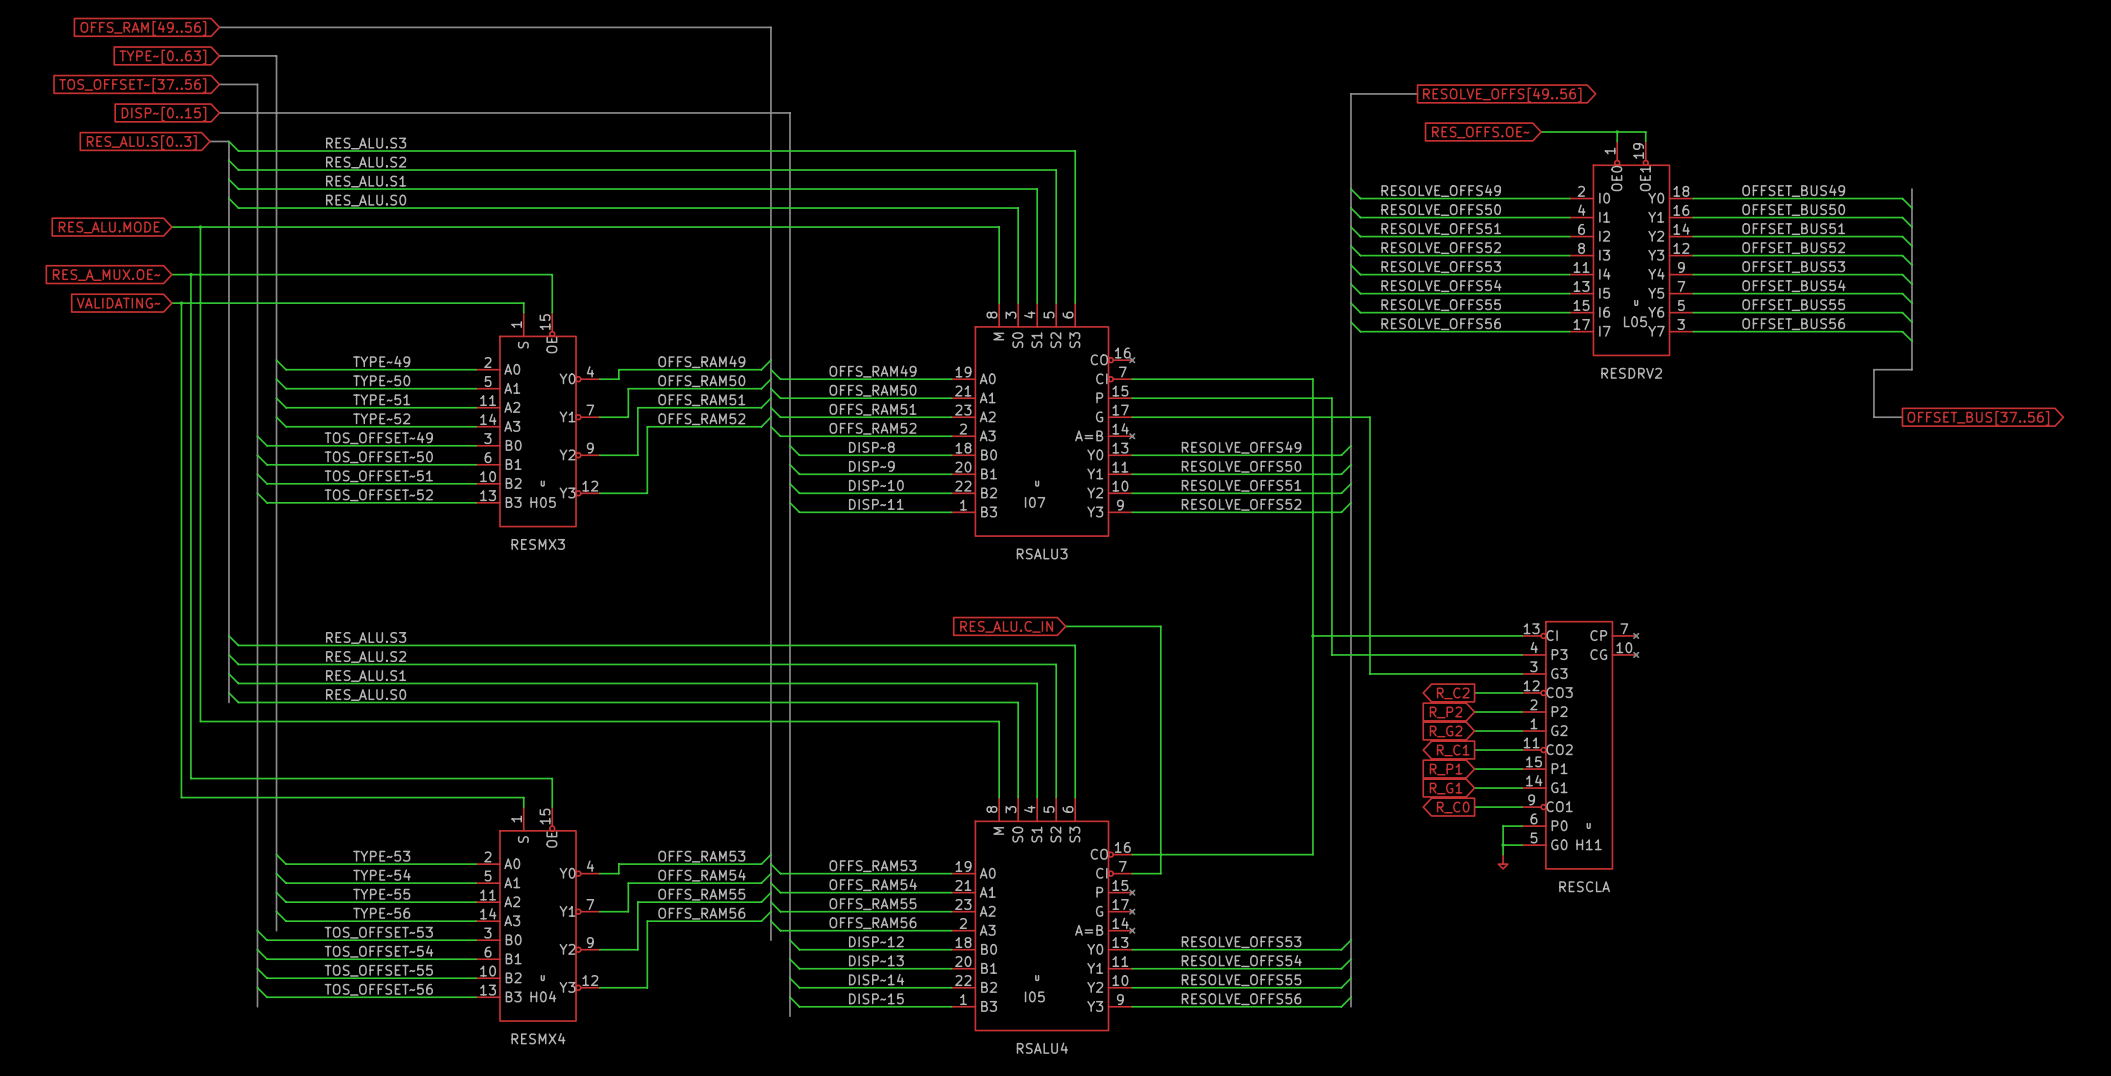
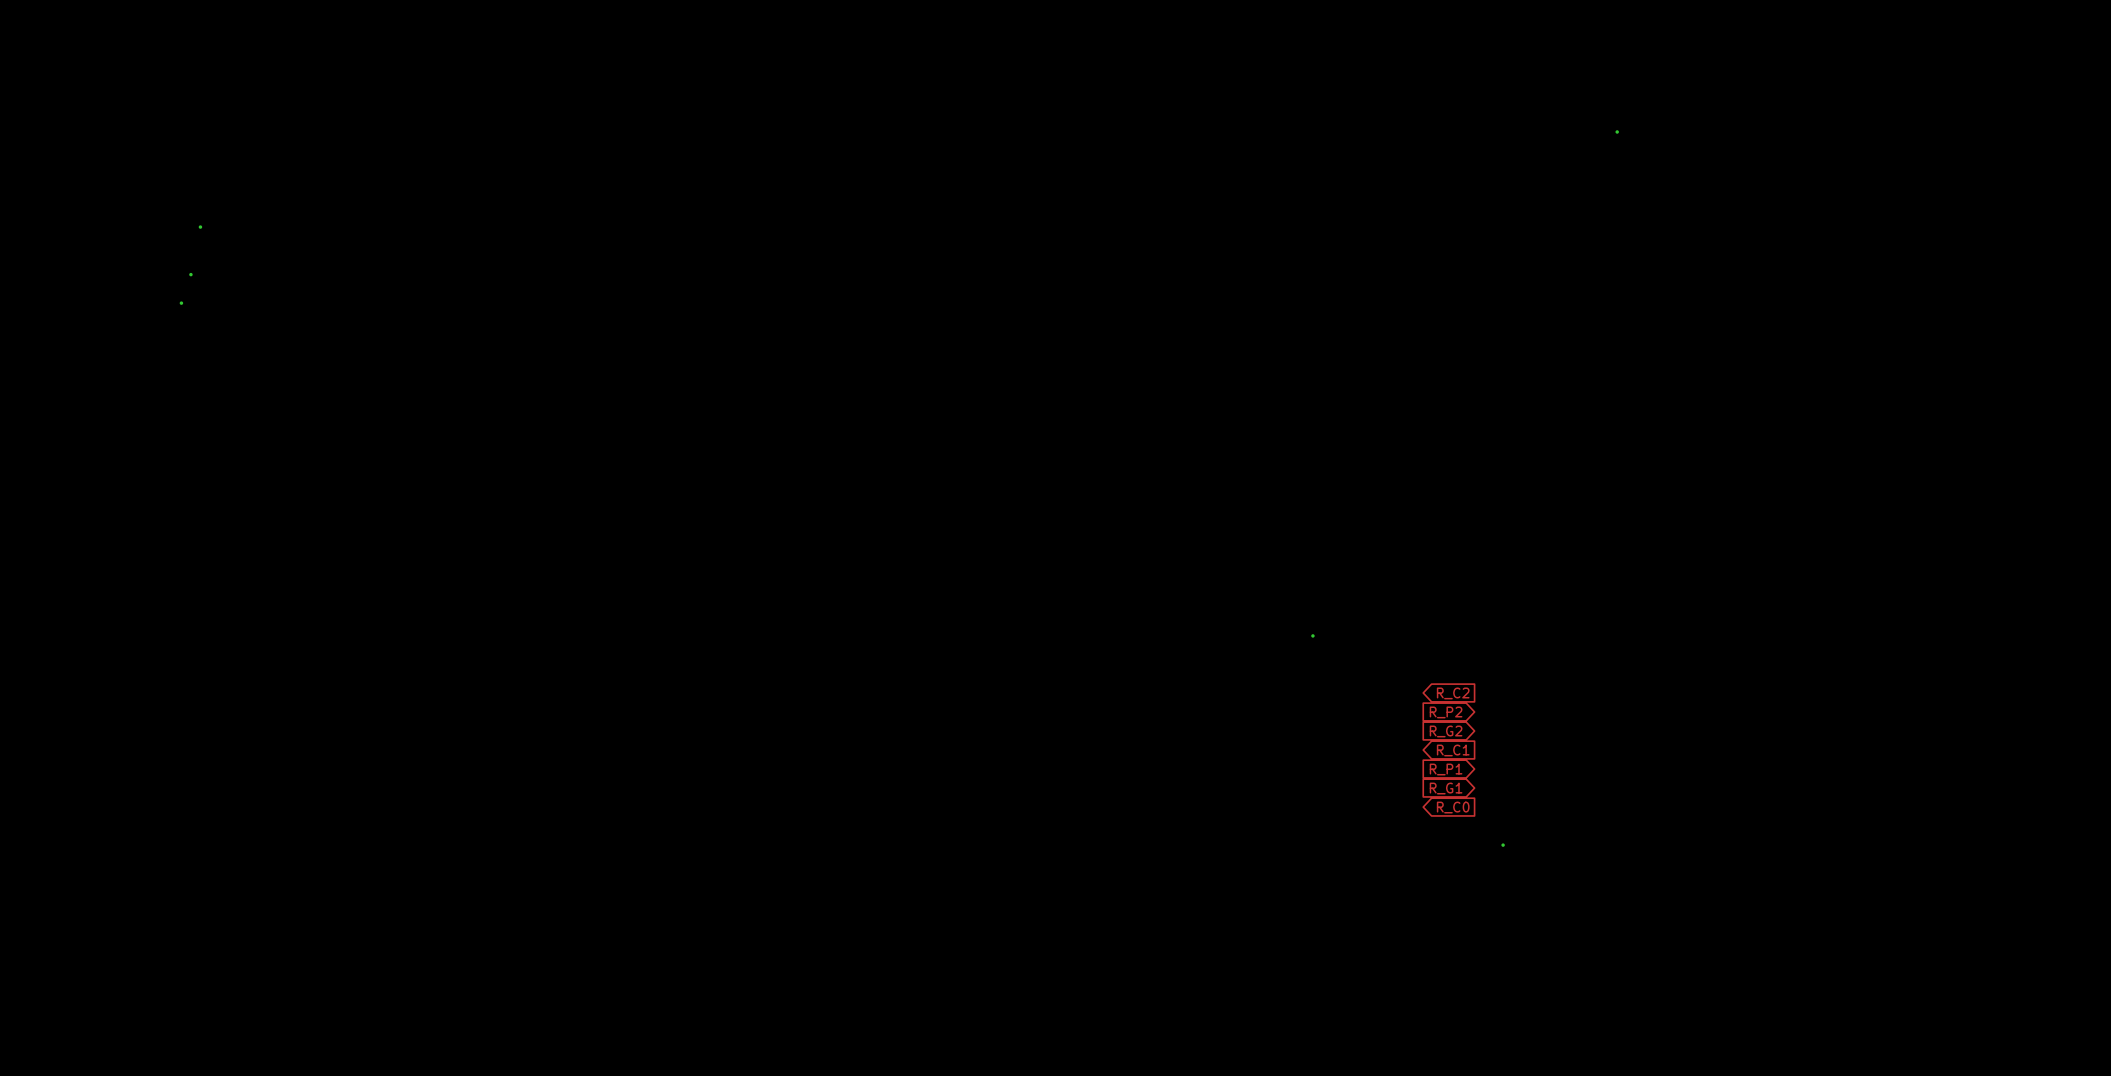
bus: (219, 27) (770, 27) (770, 940) -> none
global label: OFFS_RAM[49..56] (143, 28) -> none
bus: (219, 55) (276, 55) (276, 930) -> none
global label: TYPE~[0..63] (162, 57) -> none
bus: (219, 84) (257, 84) (257, 1006) -> none
global label: TOS_OFFSET~[37..56] (132, 85) -> none
bus: (1417, 93) (1350, 93) (1350, 1006) -> none
global label: RESOLVE_OFFS[49..56] (1502, 95) -> none
bus: (219, 112) (789, 112) (789, 1016) -> none
global label: DISP~[0..15] (164, 114) -> none
wire: (1541, 131) (1645, 131) (1645, 141) -> none
wire: (1617, 131) (1617, 141) -> none
global label: RES_OFFS.OE~ (1480, 132) -> none
bus: (209, 141) (228, 141) (228, 702) -> none
wire: (228, 141) (238, 151) (1075, 151) (1075, 303) -> none
global label: RES_ALU.S[0..3] (141, 142) -> none
label: RES_ALU.S3 (366, 143) -> none
wire: (228, 160) (238, 170) (1056, 170) (1056, 303) -> none
label: RES_ALU.S2 (366, 162) -> none
wire: (228, 179) (238, 189) (1037, 189) (1037, 303) -> none
label: RES_ALU.S1 (366, 181) -> none
wire: (1350, 189) (1360, 198) (1569, 198) -> none
bus: (1911, 189) (1911, 369) (1873, 369) (1873, 417) (1902, 417) -> none
label: RESOLVE_OFFS49 (1441, 190) -> none
label: OFFSET_BUS49 (1793, 190) -> none
wire: (228, 198) (238, 208) (1018, 208) (1018, 303) -> none
wire: (1693, 198) (1902, 198) (1911, 208) -> none
label: RES_ALU.S0 (366, 200) -> none
wire: (1350, 208) (1360, 217) (1569, 217) -> none
label: RESOLVE_OFFS50 (1441, 210) -> none
label: OFFSET_BUS50 (1793, 210) -> none
wire: (1693, 217) (1902, 217) (1911, 227) -> none
global label: RES_ALU.MODE (109, 227) -> none
wire: (171, 227) (999, 227) (999, 303) -> none
wire: (200, 227) (200, 721) (999, 721) (999, 797) -> none
wire: (1350, 227) (1360, 236) (1569, 236) -> none
label: RESOLVE_OFFS51 (1441, 229) -> none
label: OFFSET_BUS51 (1793, 229) -> none
wire: (1693, 236) (1902, 236) (1911, 246) -> none
wire: (1350, 246) (1360, 255) (1569, 255) -> none
label: RESOLVE_OFFS52 (1441, 248) -> none
part: (1631, 248) -> none
label: OFFSET_BUS52 (1793, 248) -> none
wire: (1693, 255) (1902, 255) (1911, 265) -> none
wire: (1350, 265) (1360, 274) (1569, 274) -> none
label: RESOLVE_OFFS53 (1441, 267) -> none
label: OFFSET_BUS53 (1793, 267) -> none
wire: (171, 274) (552, 274) (552, 312) -> none
wire: (190, 274) (190, 778) (552, 778) (552, 807) -> none
wire: (1693, 274) (1902, 274) (1911, 284) -> none
global label: RES_A_MUX.OE~ (106, 275) -> none
wire: (1350, 284) (1360, 293) (1569, 293) -> none
label: RESOLVE_OFFS54 (1441, 285) -> none
label: OFFSET_BUS54 (1793, 285) -> none
wire: (1693, 293) (1902, 293) (1911, 303) -> none
global label: VALIDATING~ (118, 303) -> none
wire: (171, 303) (523, 303) (523, 312) -> none
wire: (181, 303) (181, 797) (523, 797) (523, 807) -> none
wire: (1350, 303) (1360, 312) (1569, 312) -> none
label: RESOLVE_OFFS55 (1441, 305) -> none
label: OFFSET_BUS55 (1793, 305) -> none
wire: (1693, 312) (1902, 312) (1911, 322) -> none
wire: (1350, 322) (1360, 331) (1569, 331) -> none
label: RESOLVE_OFFS56 (1441, 324) -> none
label: OFFSET_BUS56 (1793, 324) -> none
wire: (1693, 331) (1902, 331) (1911, 341) -> none
wire: (276, 360) (286, 369) (476, 369) -> none
wire: (770, 360) (761, 369) (618, 369) (618, 379) (599, 379) -> none
no-connect mark: (1132, 360) -> none
label: TYPE~49 (381, 361) -> none
label: OFFS_RAM49 (701, 362) -> none
wire: (770, 369) (780, 379) (951, 379) -> none
label: OFFS_RAM49 (872, 371) -> none
wire: (276, 379) (286, 388) (476, 388) -> none
wire: (770, 379) (761, 388) (628, 388) (628, 417) (599, 417) -> none
wire: (1132, 379) (1312, 379) (1312, 854) (1132, 854) -> none
label: TYPE~50 (381, 380) -> none
label: OFFS_RAM50 (701, 381) -> none
wire: (770, 388) (780, 398) (951, 398) -> none
label: OFFS_RAM50 (872, 390) -> none
wire: (276, 398) (286, 407) (476, 407) -> none
wire: (770, 398) (761, 407) (637, 407) (637, 455) (599, 455) -> none
wire: (1132, 398) (1331, 398) (1331, 654) (1522, 654) -> none
label: TYPE~51 (381, 399) -> none
label: OFFS_RAM51 (701, 400) -> none
wire: (770, 407) (780, 417) (951, 417) -> none
label: OFFS_RAM51 (872, 409) -> none
wire: (276, 417) (286, 426) (476, 426) -> none
wire: (770, 417) (761, 426) (647, 426) (647, 493) (599, 493) -> none
wire: (1132, 417) (1369, 417) (1369, 673) (1522, 673) -> none
label: TYPE~52 (381, 418) -> none
global label: OFFSET_BUS[37..56] (1978, 418) -> none
part: (537, 419) -> none
label: OFFS_RAM52 (701, 419) -> none
part: (1041, 419) -> none
wire: (770, 426) (780, 436) (951, 436) -> none
label: OFFS_RAM52 (872, 428) -> none
wire: (257, 436) (267, 445) (476, 445) -> none
no-connect mark: (1132, 436) -> none
label: TOS_OFFSET~49 (378, 438) -> none
wire: (789, 445) (799, 455) (951, 455) -> none
wire: (1350, 445) (1341, 455) (1132, 455) -> none
label: DISP~8 (871, 447) -> none
label: RESOLVE_OFFS49 (1241, 447) -> none
wire: (257, 455) (267, 464) (476, 464) -> none
label: TOS_OFFSET~50 (378, 457) -> none
wire: (789, 464) (799, 474) (951, 474) -> none
wire: (1350, 464) (1341, 474) (1132, 474) -> none
label: DISP~9 (871, 466) -> none
label: RESOLVE_OFFS50 (1241, 466) -> none
wire: (257, 474) (267, 483) (476, 483) -> none
label: TOS_OFFSET~51 (378, 476) -> none
wire: (789, 483) (799, 493) (951, 493) -> none
wire: (1350, 483) (1341, 493) (1132, 493) -> none
label: DISP~10 (876, 485) -> none
label: RESOLVE_OFFS51 (1241, 485) -> none
wire: (257, 493) (267, 502) (476, 502) -> none
label: TOS_OFFSET~52 (378, 495) -> none
wire: (789, 502) (799, 512) (951, 512) -> none
wire: (1350, 502) (1341, 512) (1132, 512) -> none
label: DISP~11 (876, 504) -> none
label: RESOLVE_OFFS52 (1241, 504) -> none
global label: RES_ALU.C_IN (1006, 626) -> none
wire: (1065, 626) (1160, 626) (1160, 873) (1132, 873) -> none
wire: (228, 635) (238, 645) (1075, 645) (1075, 797) -> none
wire: (1312, 635) (1522, 635) -> none
no-connect mark: (1636, 635) -> none
label: RES_ALU.S3 (366, 637) -> none
wire: (228, 654) (238, 664) (1056, 664) (1056, 797) -> none
no-connect mark: (1636, 654) -> none
label: RES_ALU.S2 (366, 656) -> none
wire: (228, 673) (238, 683) (1037, 683) (1037, 797) -> none
label: RES_ALU.S1 (366, 676) -> none
wire: (228, 692) (238, 702) (1018, 702) (1018, 797) -> none
wire: (1474, 692) (1522, 692) -> none
label: RES_ALU.S0 (366, 695) -> none
wire: (1474, 712) (1522, 712) -> none
wire: (1474, 731) (1522, 731) -> none
part: (1579, 745) -> none
wire: (1474, 750) (1522, 750) -> none
wire: (1474, 769) (1522, 769) -> none
wire: (1474, 788) (1522, 788) -> none
wire: (1474, 807) (1522, 807) -> none
wire: (1522, 826) (1503, 826) (1503, 854) -> none
wire: (1503, 845) (1522, 845) -> none
wire: (276, 854) (286, 864) (476, 864) -> none
wire: (770, 854) (761, 864) (618, 864) (618, 873) (599, 873) -> none
label: TYPE~53 (381, 856) -> none
label: OFFS_RAM53 (701, 856) -> none
power symbol: (1503, 861) -> none
wire: (770, 864) (780, 873) (951, 873) -> none
label: OFFS_RAM53 (872, 866) -> none
wire: (276, 873) (286, 883) (476, 883) -> none
wire: (770, 873) (761, 883) (628, 883) (628, 911) (599, 911) -> none
label: TYPE~54 (381, 875) -> none
label: OFFS_RAM54 (702, 875) -> none
wire: (770, 883) (780, 892) (951, 892) -> none
label: OFFS_RAM54 (873, 884) -> none
wire: (276, 892) (286, 902) (476, 902) -> none
wire: (770, 892) (761, 902) (637, 902) (637, 949) (599, 949) -> none
no-connect mark: (1132, 892) -> none
label: TYPE~55 (381, 894) -> none
label: OFFS_RAM55 (701, 894) -> none
wire: (770, 902) (780, 911) (951, 911) -> none
label: OFFS_RAM55 (872, 904) -> none
wire: (276, 911) (286, 921) (476, 921) -> none
wire: (770, 911) (761, 921) (647, 921) (647, 987) (599, 987) -> none
no-connect mark: (1132, 911) -> none
label: TYPE~56 (381, 913) -> none
label: OFFS_RAM56 (701, 913) -> none
part: (537, 914) -> none
part: (1041, 914) -> none
wire: (770, 921) (780, 930) (951, 930) -> none
label: OFFS_RAM56 (872, 923) -> none
wire: (257, 930) (267, 940) (476, 940) -> none
no-connect mark: (1132, 930) -> none
label: TOS_OFFSET~53 (378, 932) -> none
wire: (789, 940) (799, 949) (951, 949) -> none
wire: (1350, 940) (1341, 949) (1132, 949) -> none
label: DISP~12 (876, 941) -> none
label: RESOLVE_OFFS53 (1241, 942) -> none
wire: (257, 949) (267, 959) (476, 959) -> none
label: TOS_OFFSET~54 (378, 951) -> none
wire: (789, 959) (799, 968) (951, 968) -> none
wire: (1350, 959) (1341, 968) (1132, 968) -> none
label: DISP~13 (876, 960) -> none
label: RESOLVE_OFFS54 (1241, 961) -> none
wire: (257, 968) (267, 978) (476, 978) -> none
label: TOS_OFFSET~55 (378, 970) -> none
wire: (789, 978) (799, 987) (951, 987) -> none
wire: (1350, 978) (1341, 987) (1132, 987) -> none
label: DISP~14 (876, 979) -> none
label: RESOLVE_OFFS55 (1241, 980) -> none
wire: (257, 987) (267, 997) (476, 997) -> none
label: TOS_OFFSET~56 (378, 989) -> none
wire: (789, 997) (799, 1006) (951, 1006) -> none
wire: (1350, 997) (1341, 1006) (1132, 1006) -> none
label: DISP~15 (876, 998) -> none
label: RESOLVE_OFFS56 (1241, 999) -> none

